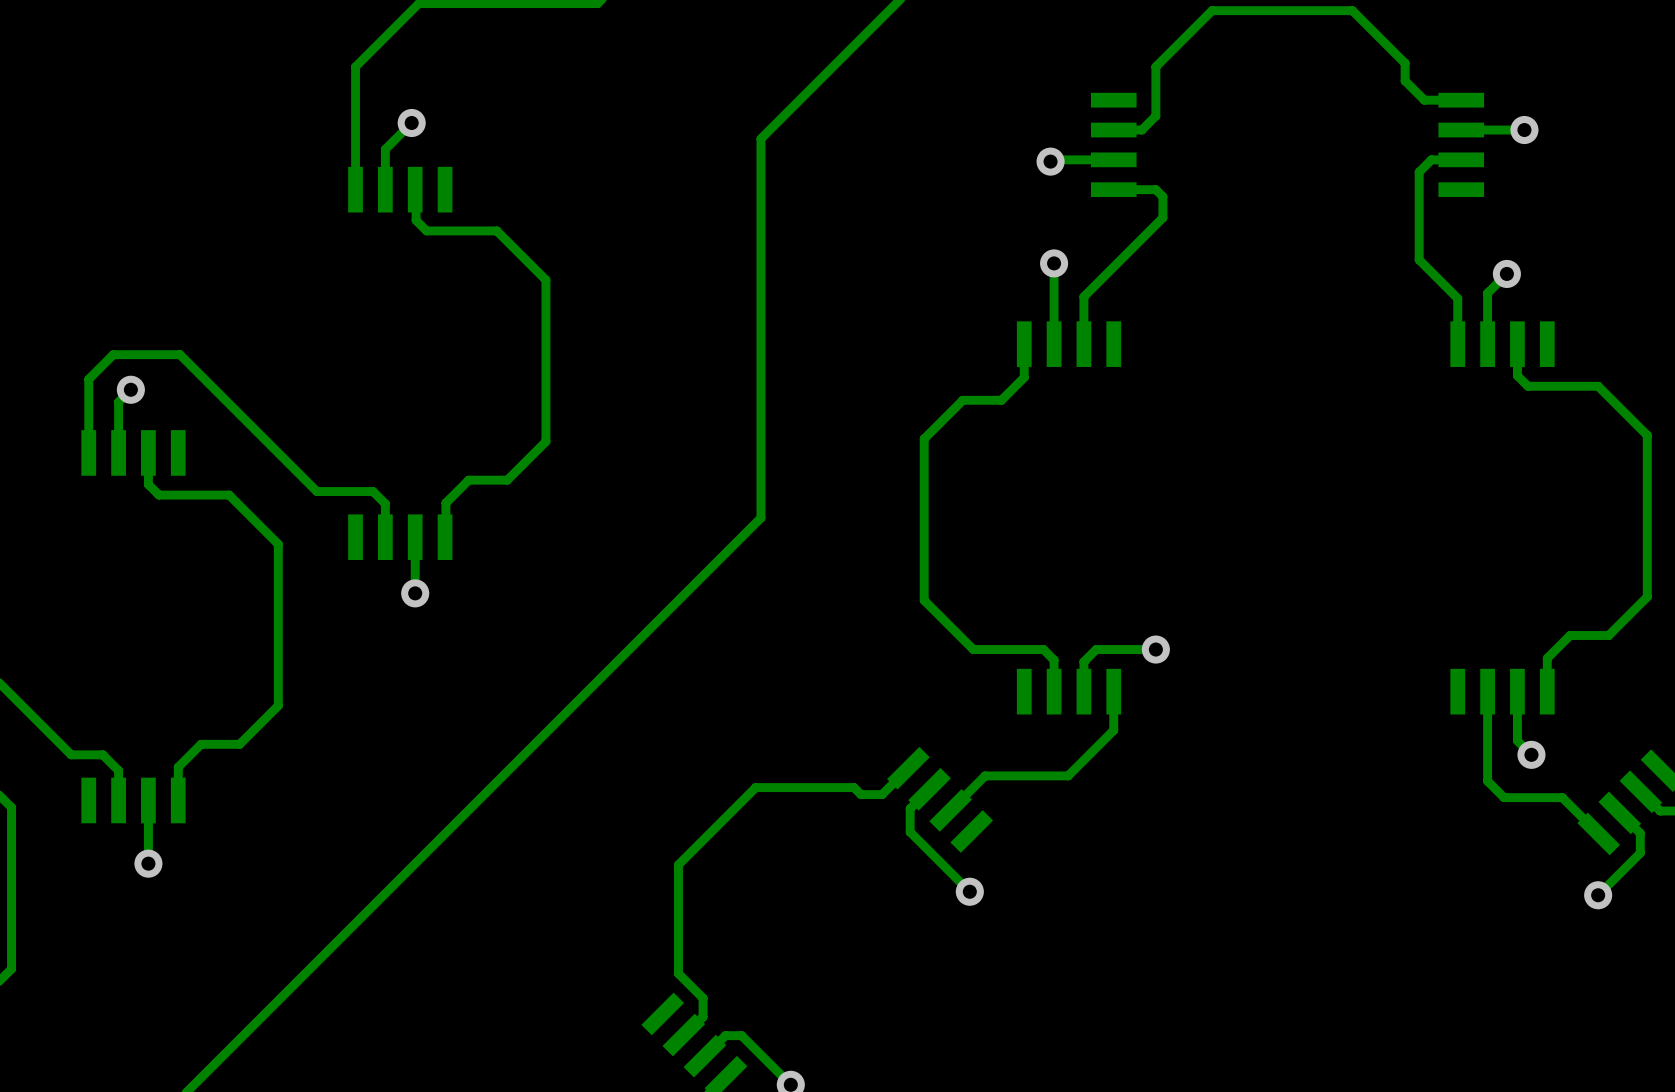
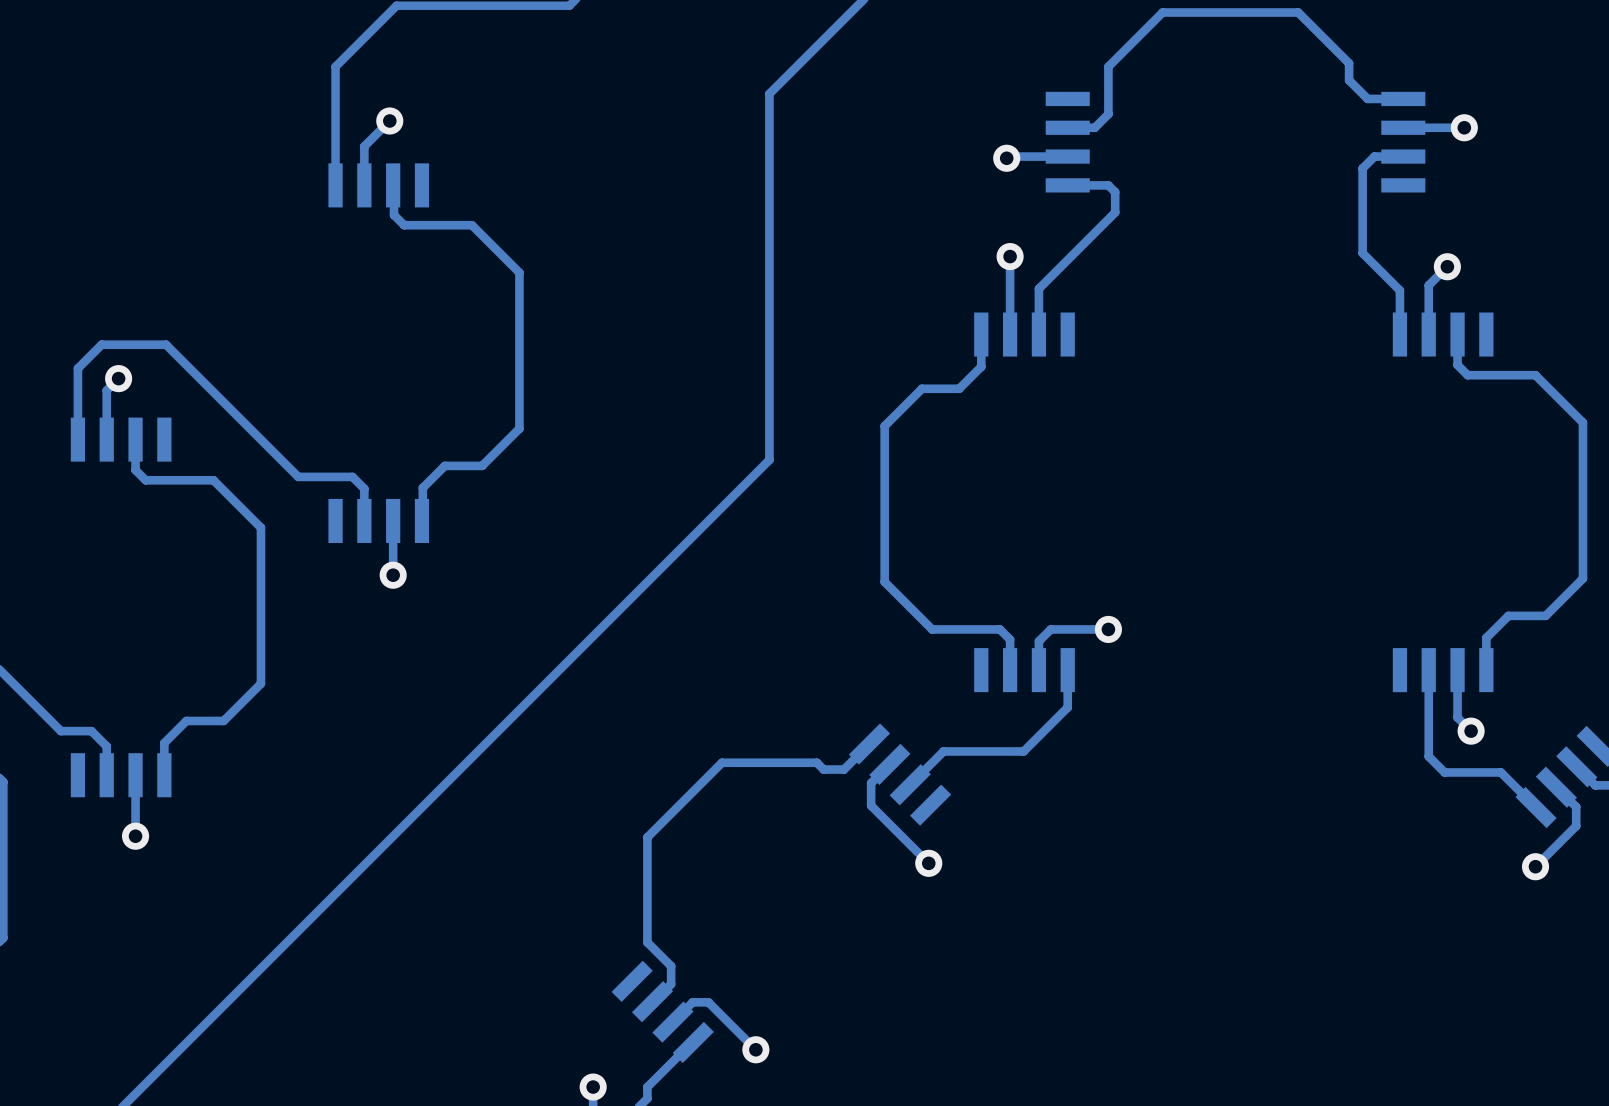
track: (804, 94) (760, 138) (760, 517) -> (769, 93) (769, 459) (727, 502)

